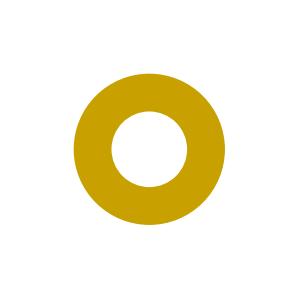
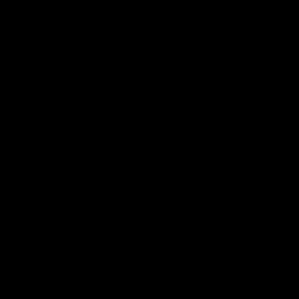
part: (149, 149) -> none

